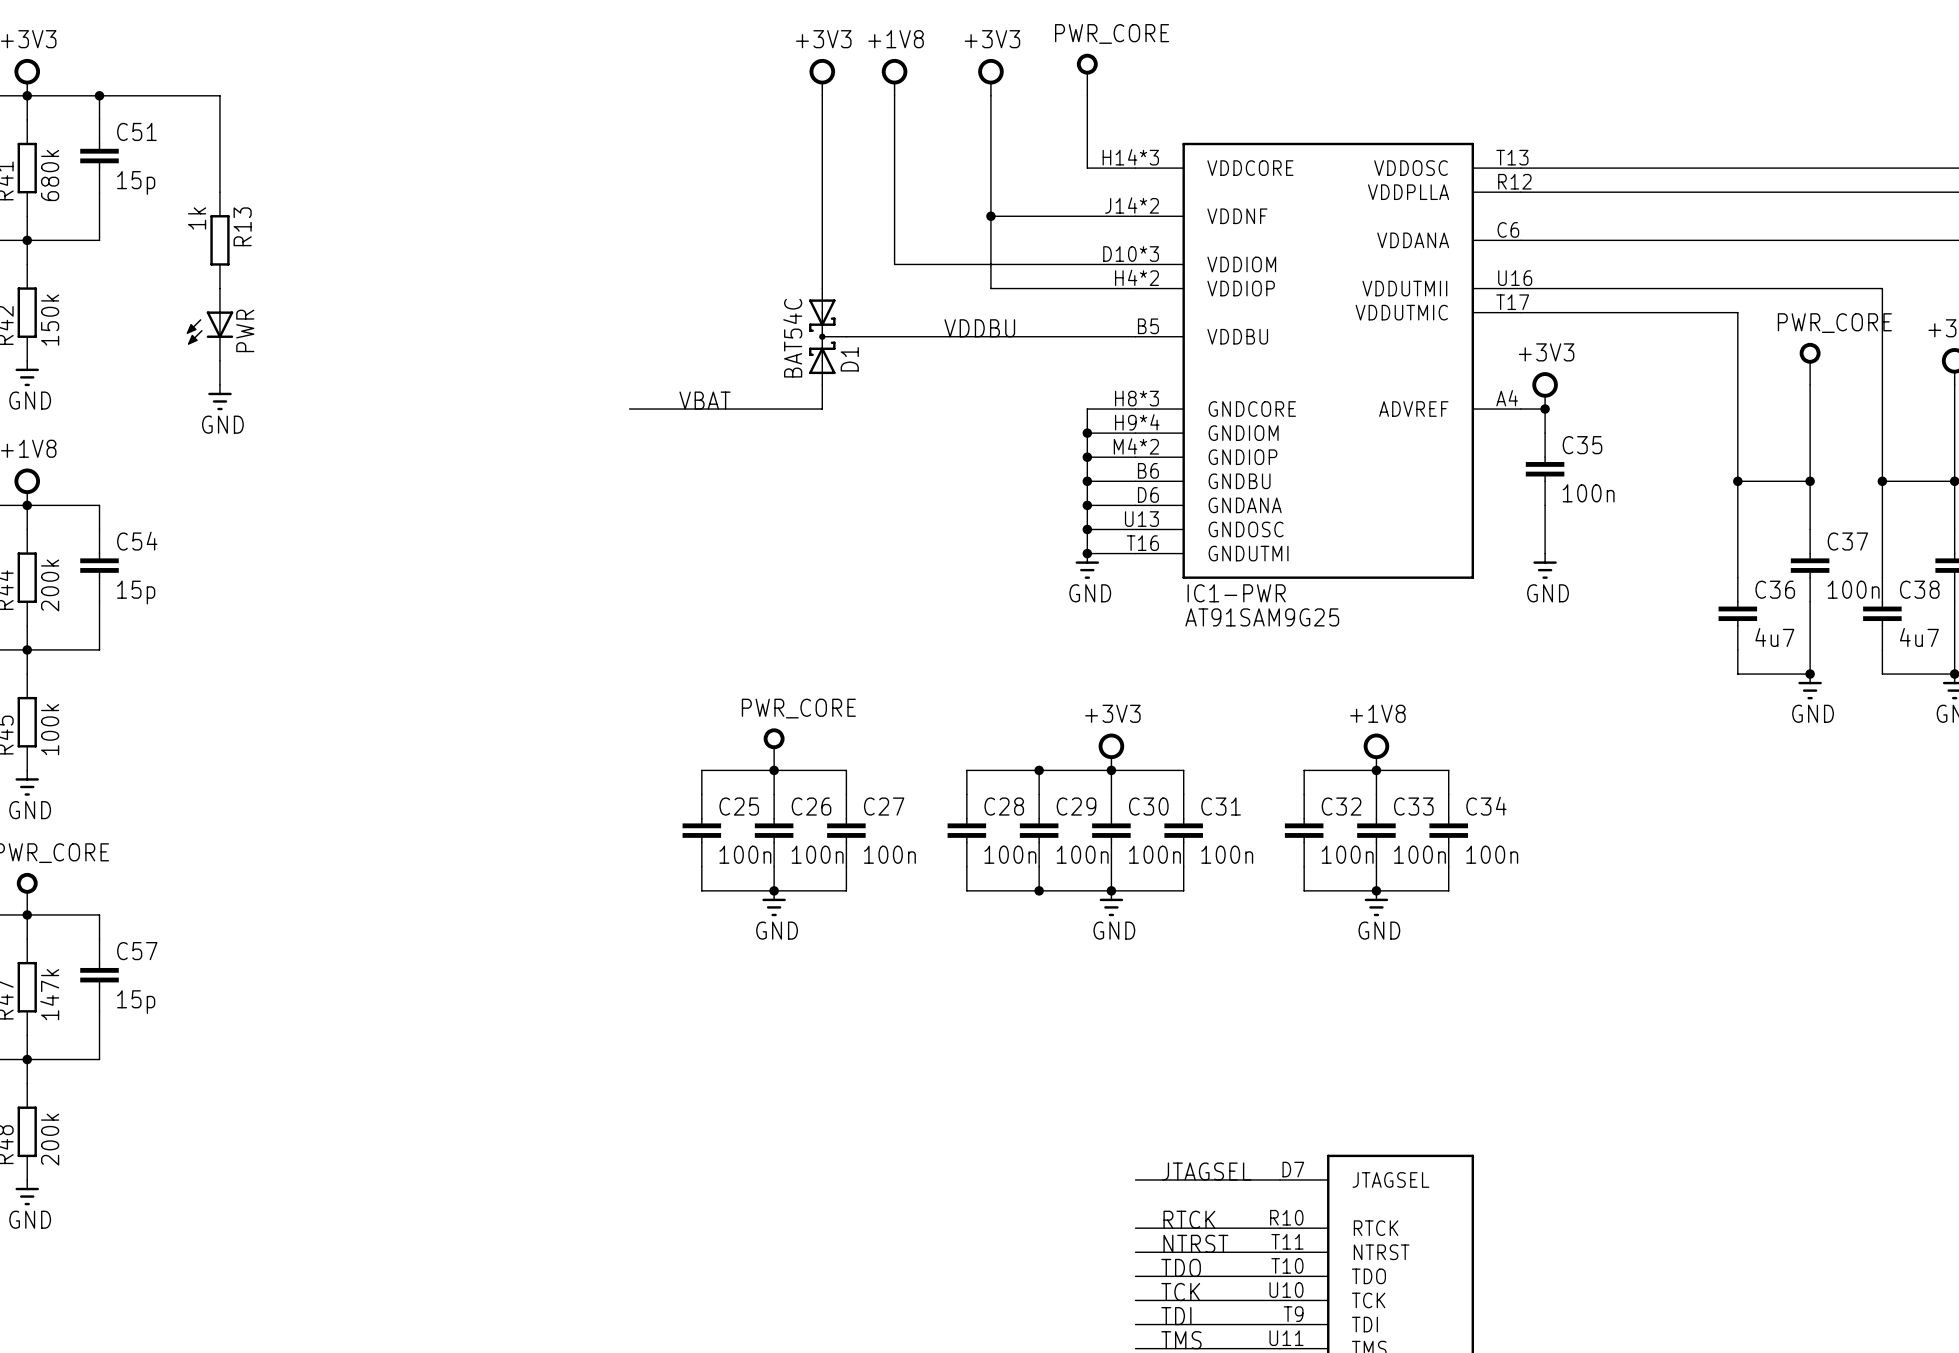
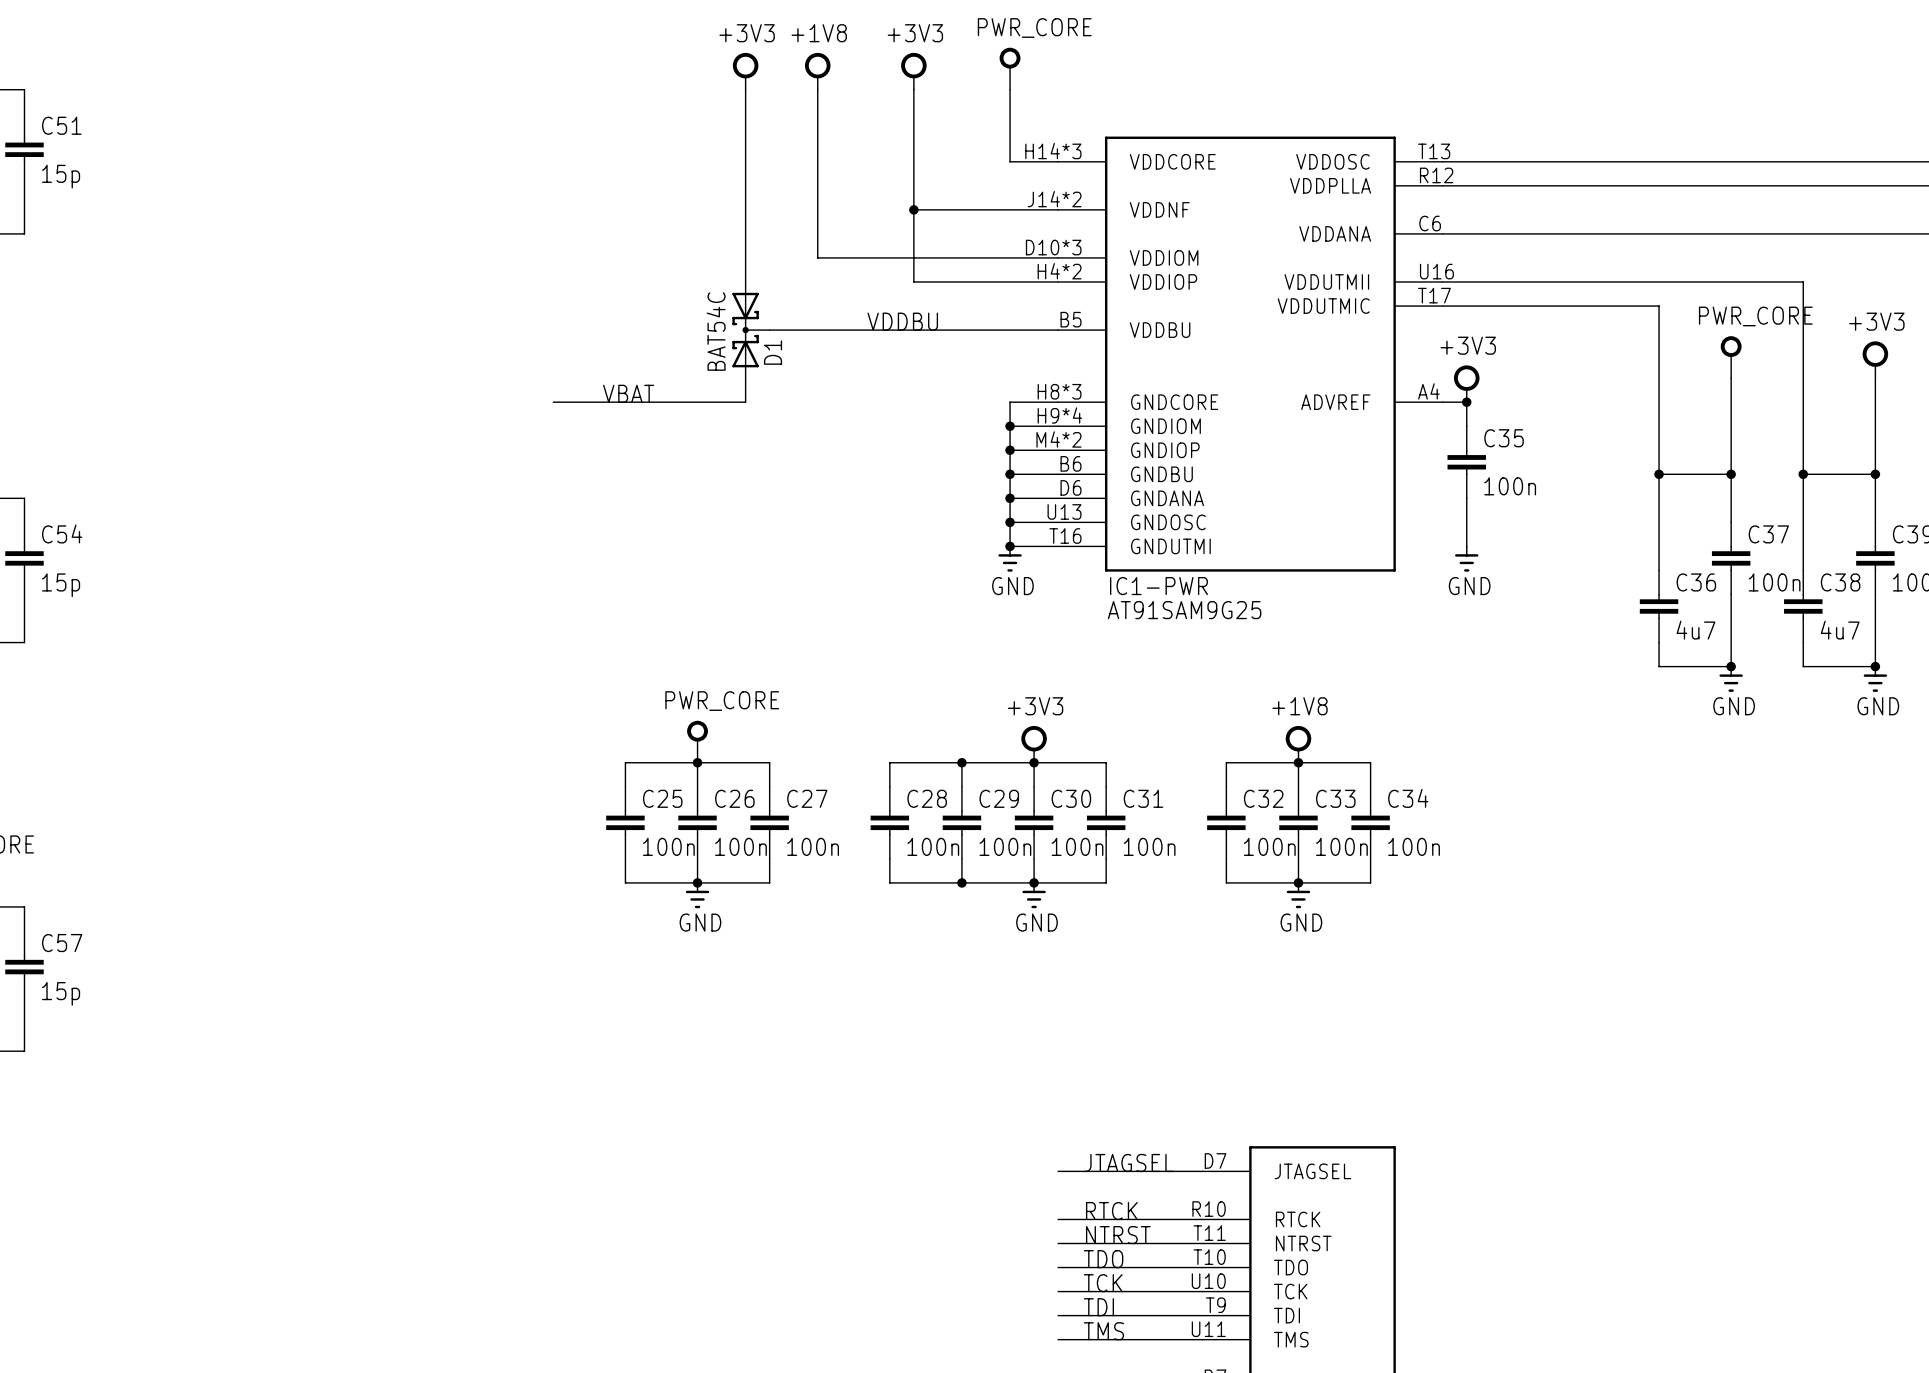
wire: (99, 95) (219, 95) (219, 192) -> none
junction: (99, 95) -> none
R13: 1k (219, 240) -> none
PWR: (209, 324) -> none
wire: (219, 360) (219, 384) -> none
power symbol: GND (219, 397) -> none

